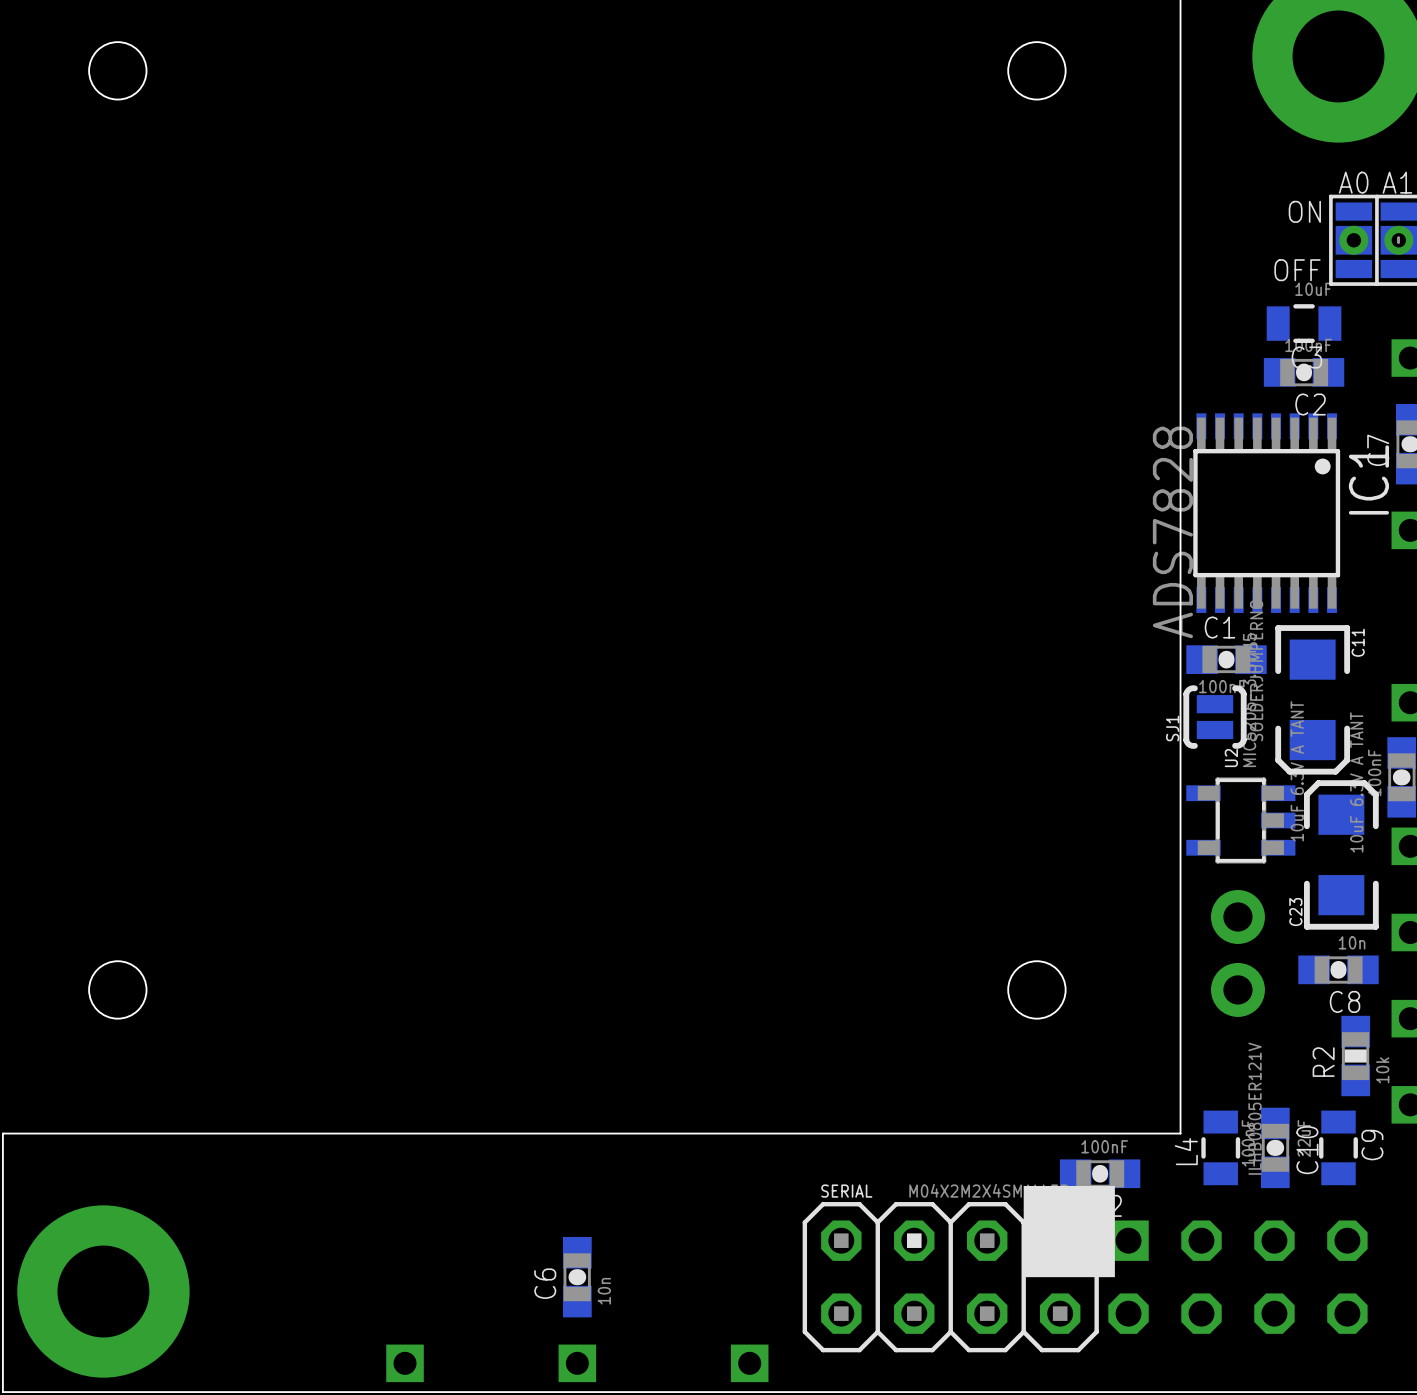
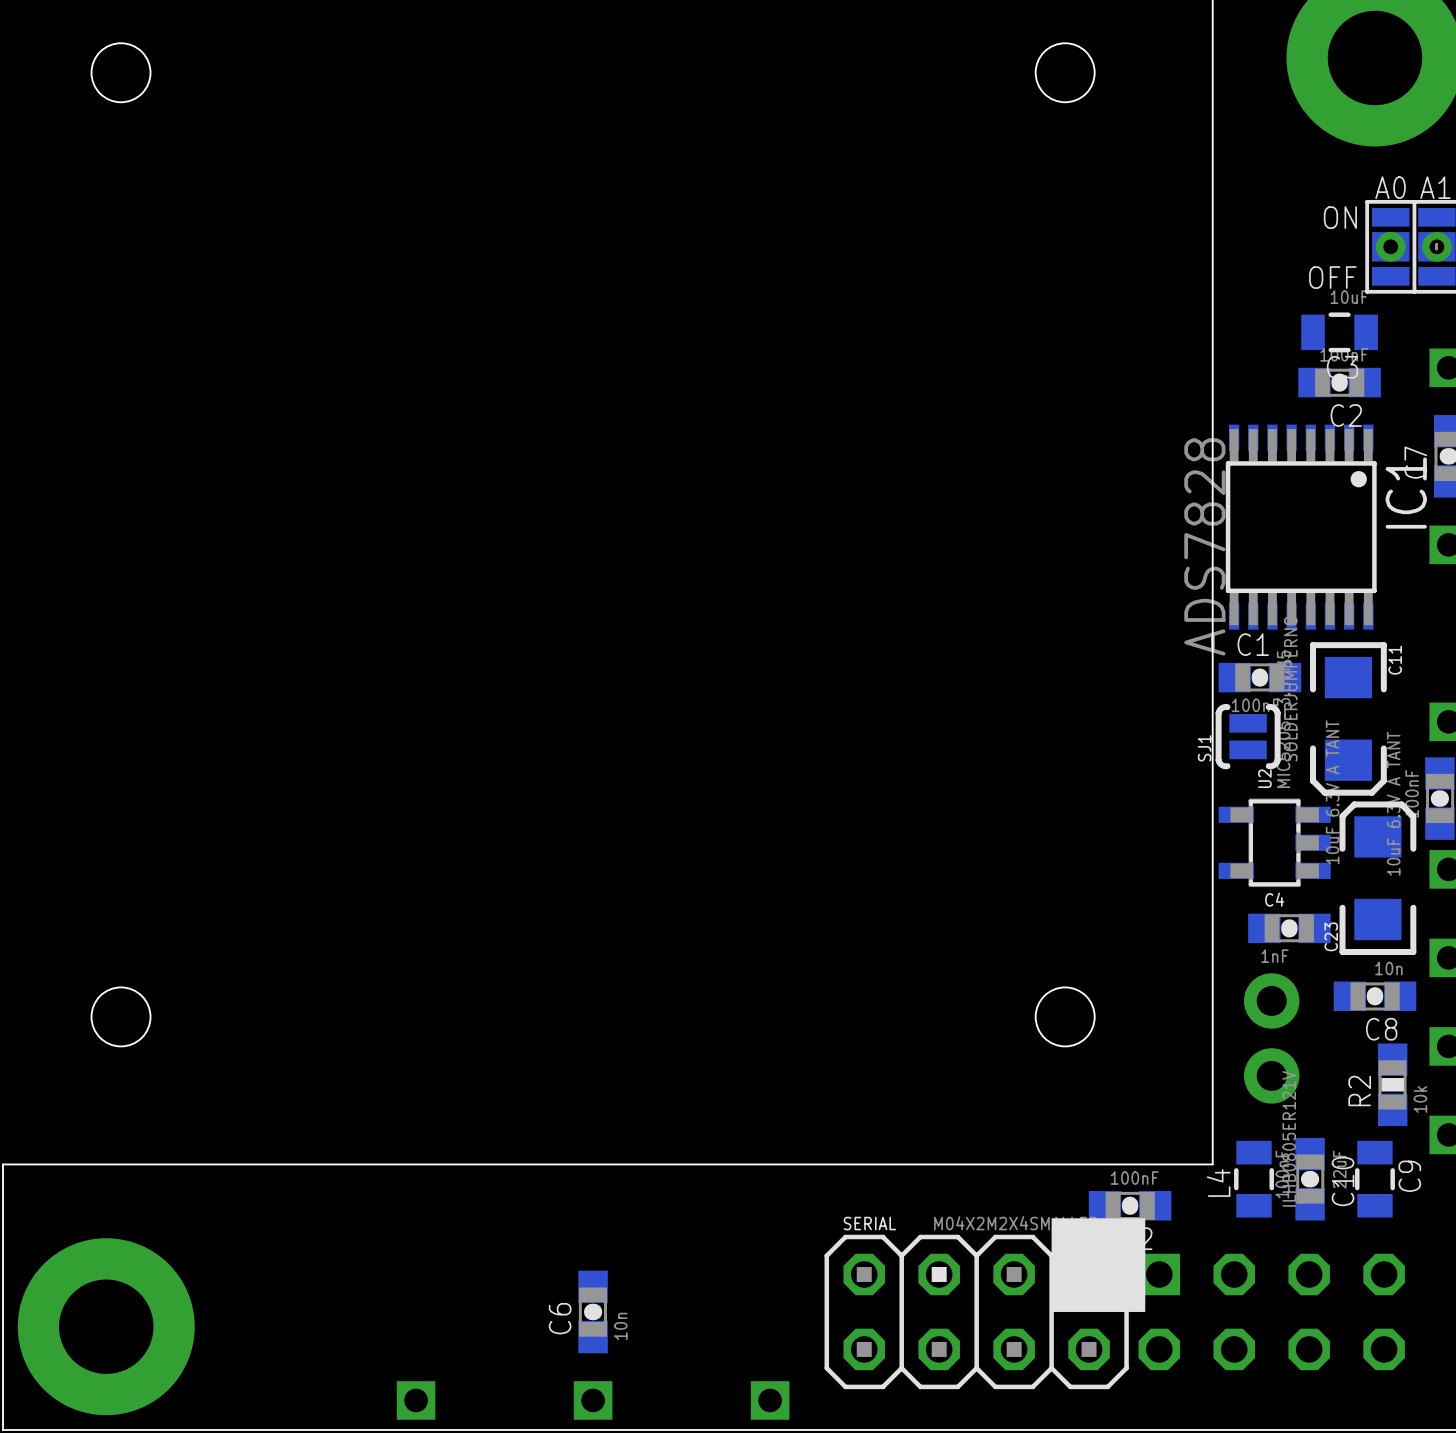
C4: none -> 1nF (1289, 928)
part position: (1237, 953) -> (1271, 1038)

